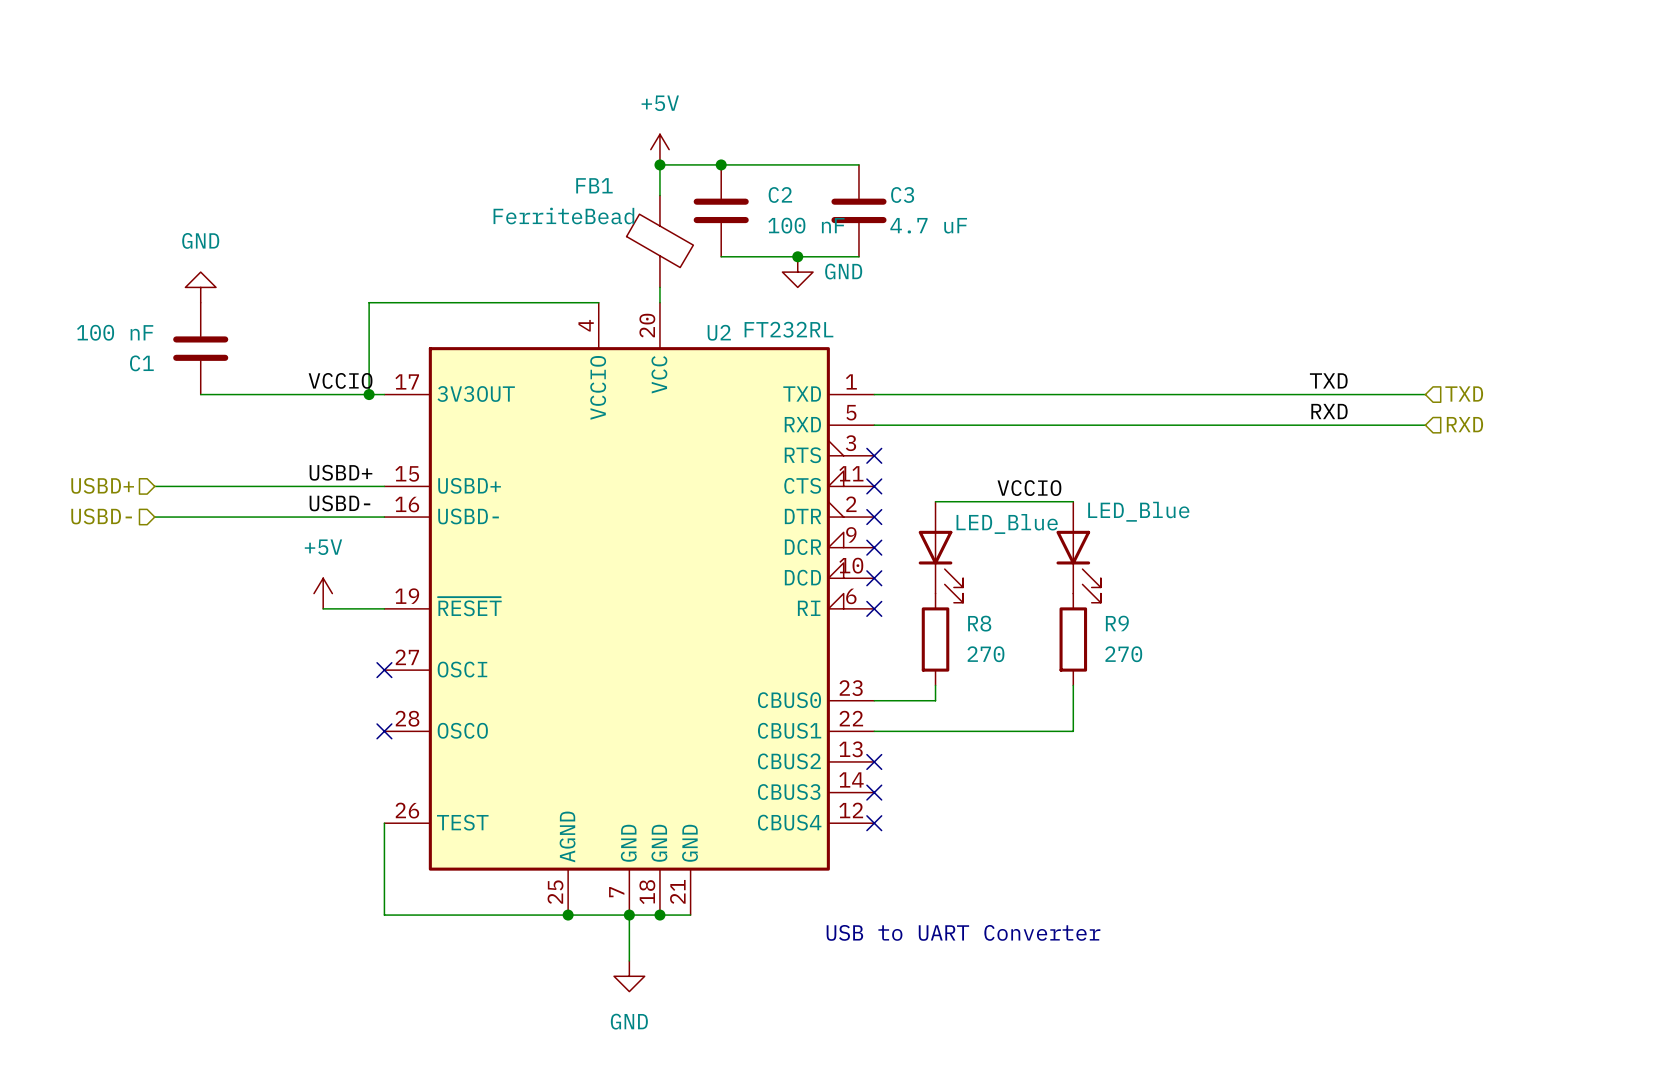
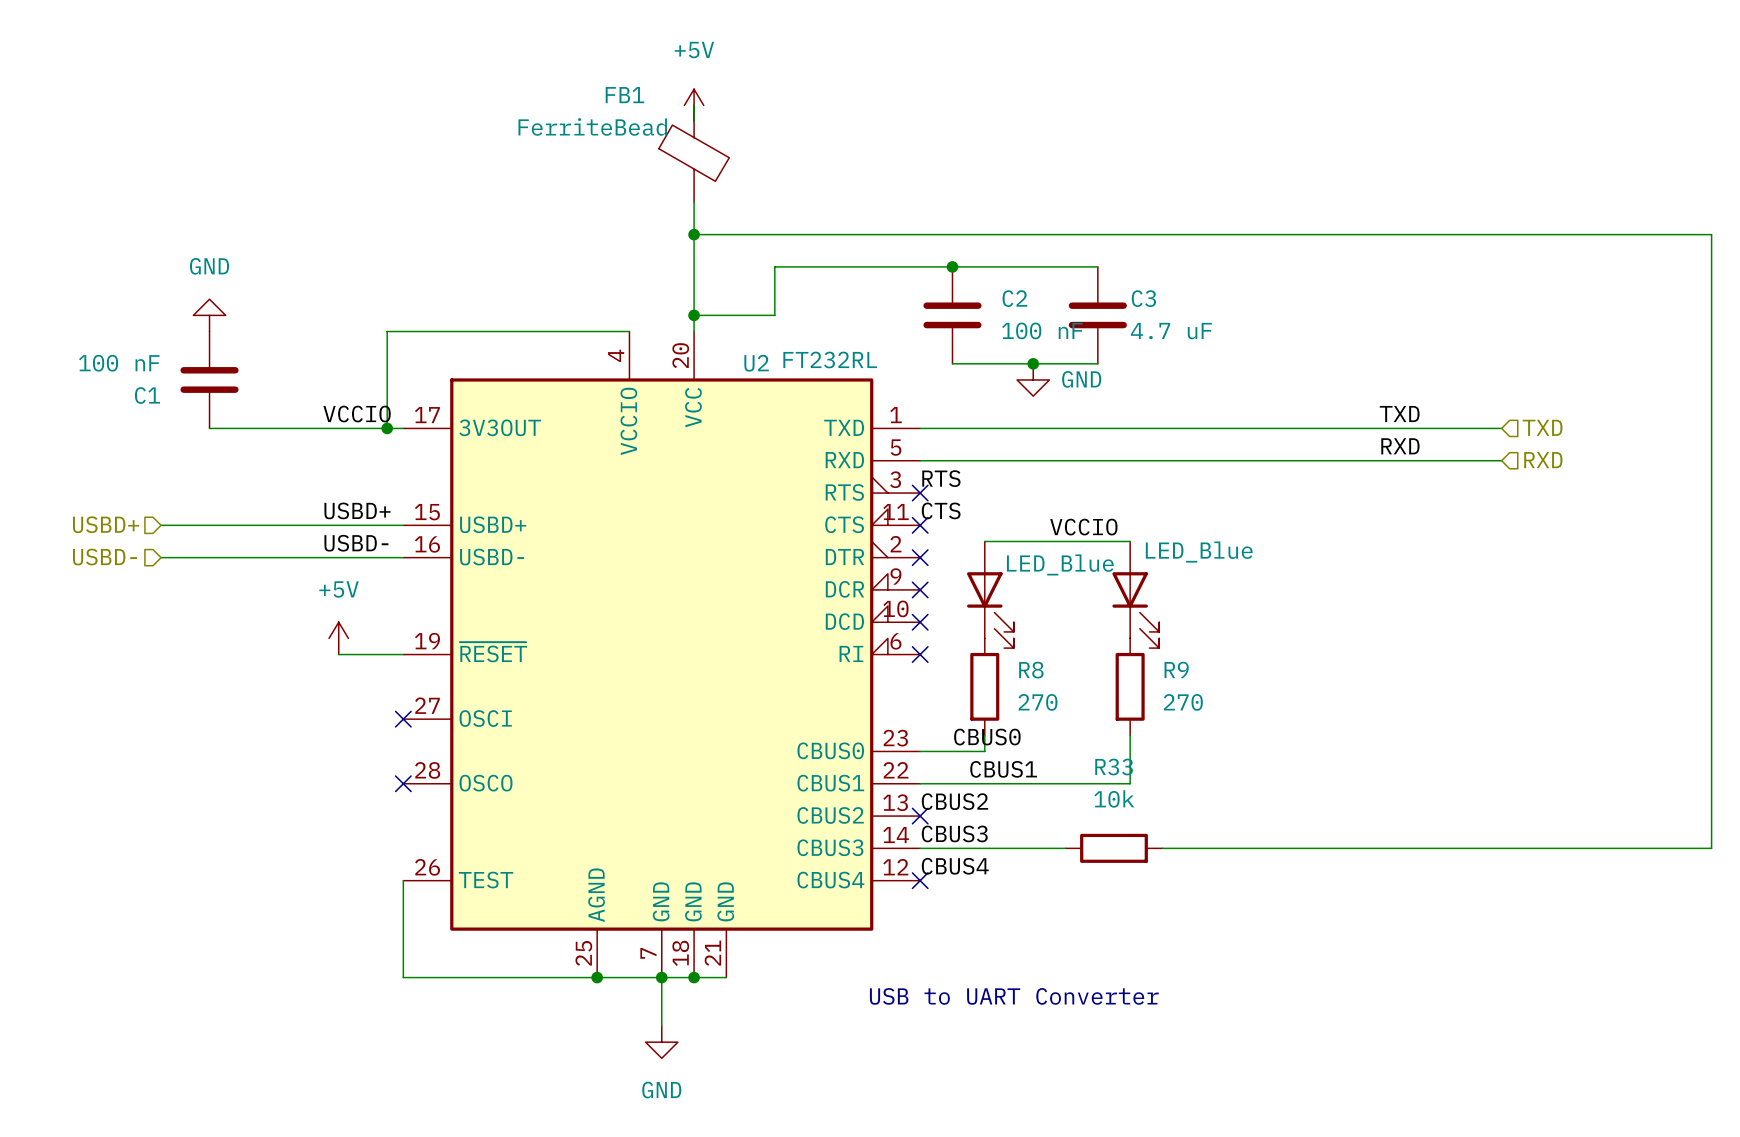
wire: none -> (694, 105) (694, 121)
power symbol text position: +5V (660, 103) -> +5V (694, 50)
power symbol position: +5V (659, 149) -> +5V (694, 105)
junction: (659, 164) -> none
junction: (721, 164) -> none
wire: (858, 164) (659, 164) (659, 180) -> none
wire: none -> (694, 218) (694, 315) (774, 315) (774, 266) (1097, 266)
wire: none -> (694, 234) (1711, 234) (1711, 848) (1162, 848)
junction: none -> (694, 234)
C2 position: (721, 210) -> (952, 315)
C3 position: (858, 210) -> (1097, 315)
FB1 position: (659, 241) -> (694, 153)
junction: none -> (952, 266)
wire: (721, 256) (858, 256) -> (952, 363) (1097, 363)
junction: (797, 256) -> none
power symbol position: GND (797, 272) -> GND (1033, 379)
junction: none -> (694, 315)
junction: none -> (1033, 363)
label: none -> RTS (941, 478)
label: none -> CTS (941, 510)
label: none -> CBUS0 (987, 737)
label: none -> CBUS1 (1003, 769)
label: none -> CBUS2 (954, 801)
label: none -> CBUS3 (954, 833)
wire: none -> (920, 848) (1065, 848)
no-connect mark: (874, 792) -> none
R33: none -> 10k (1113, 848)
label: none -> CBUS4 (955, 866)

